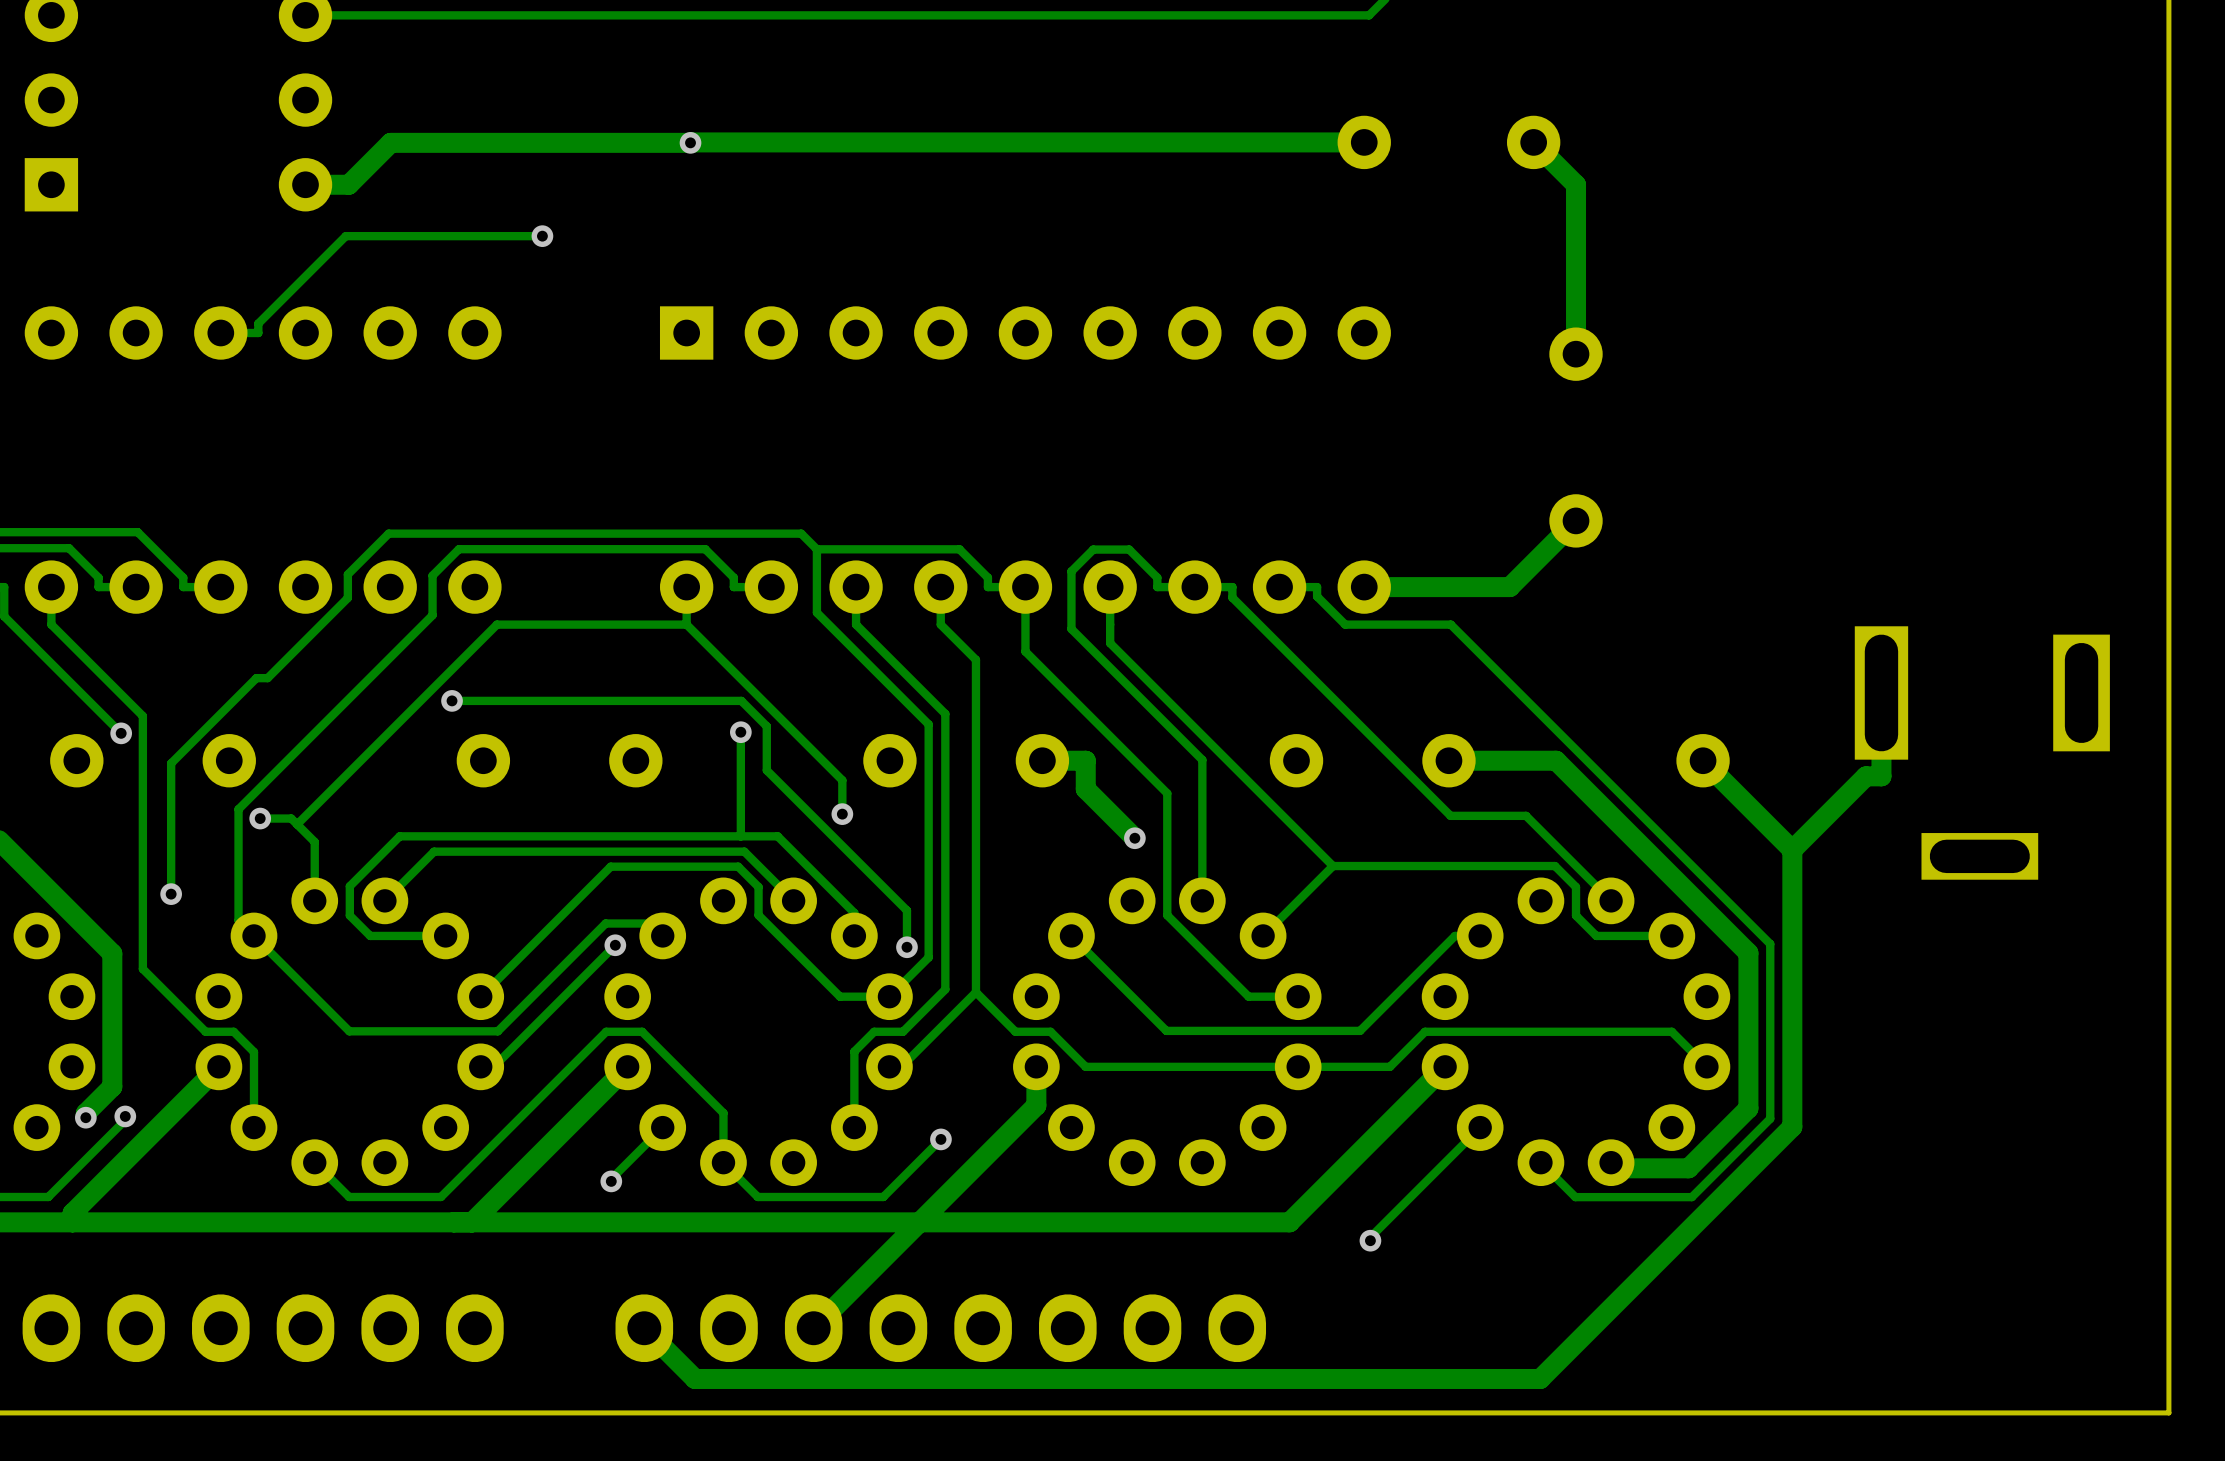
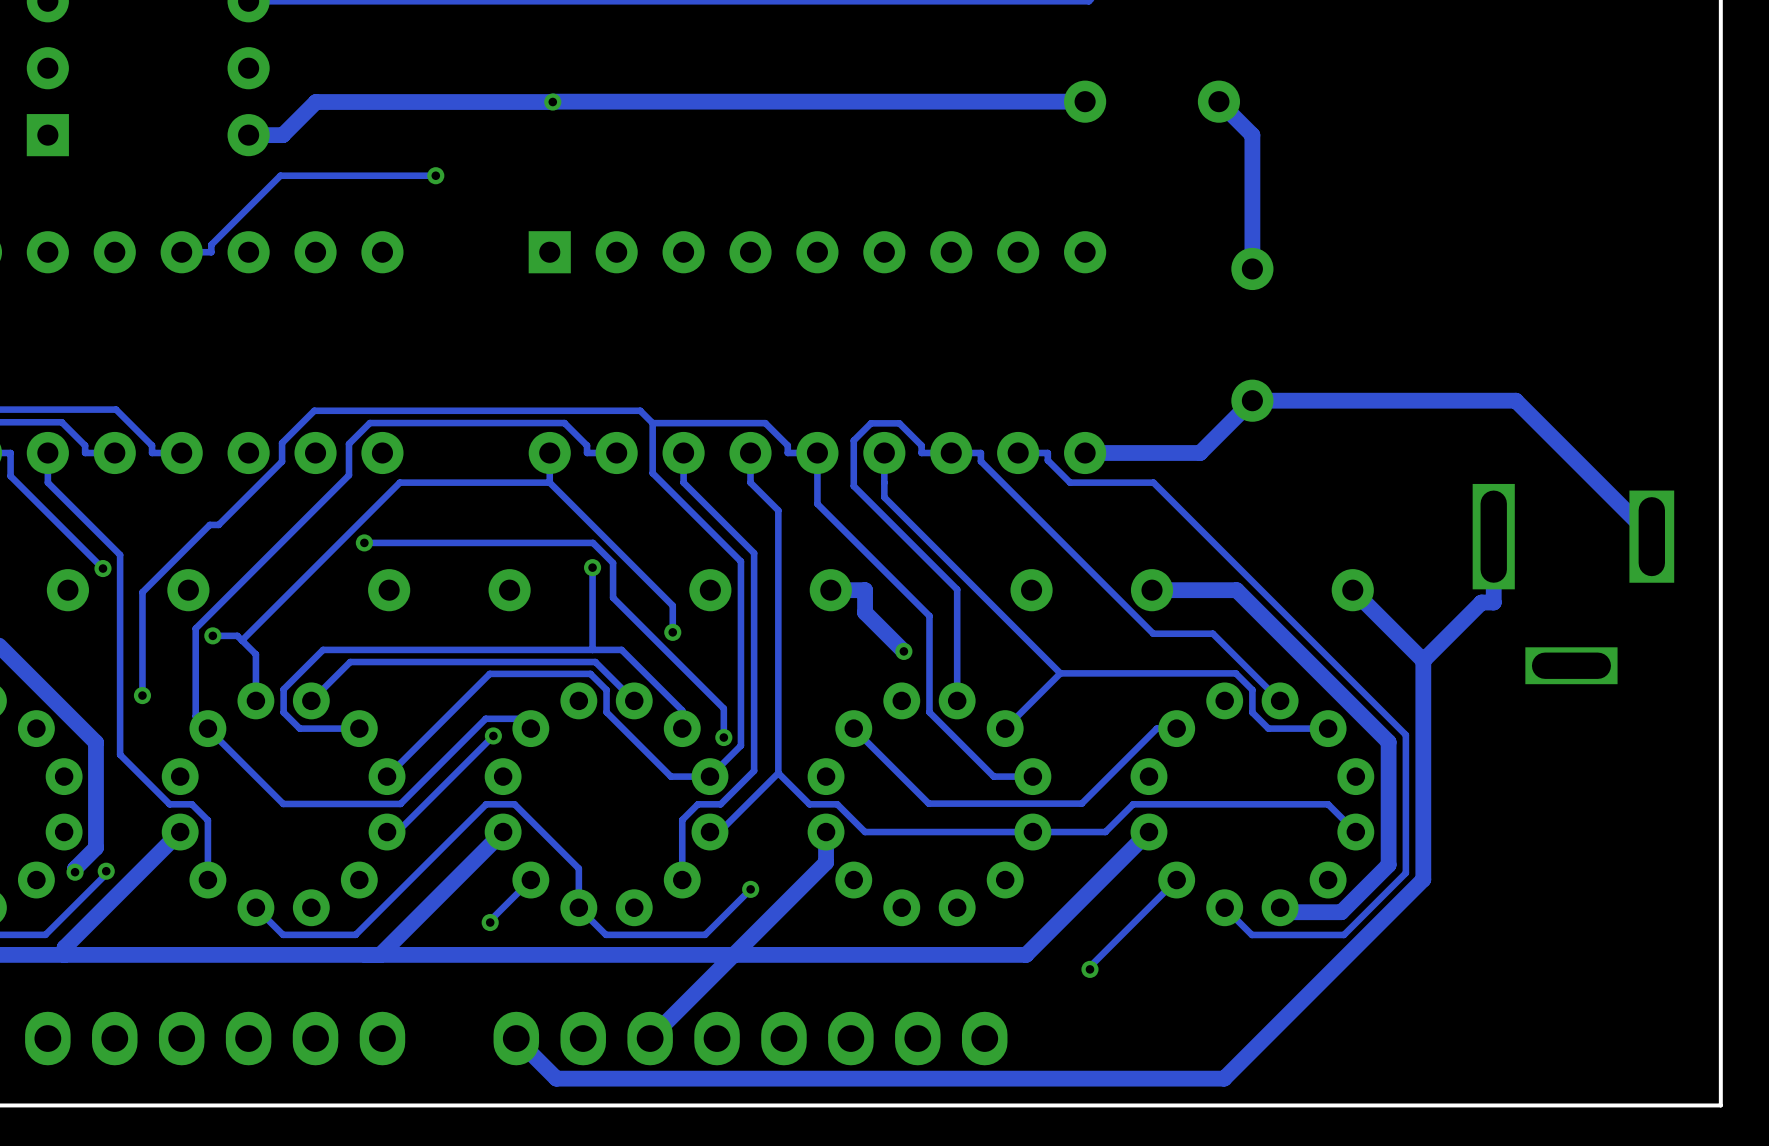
track: none -> (1252, 400) (1515, 400) (1651, 536)

